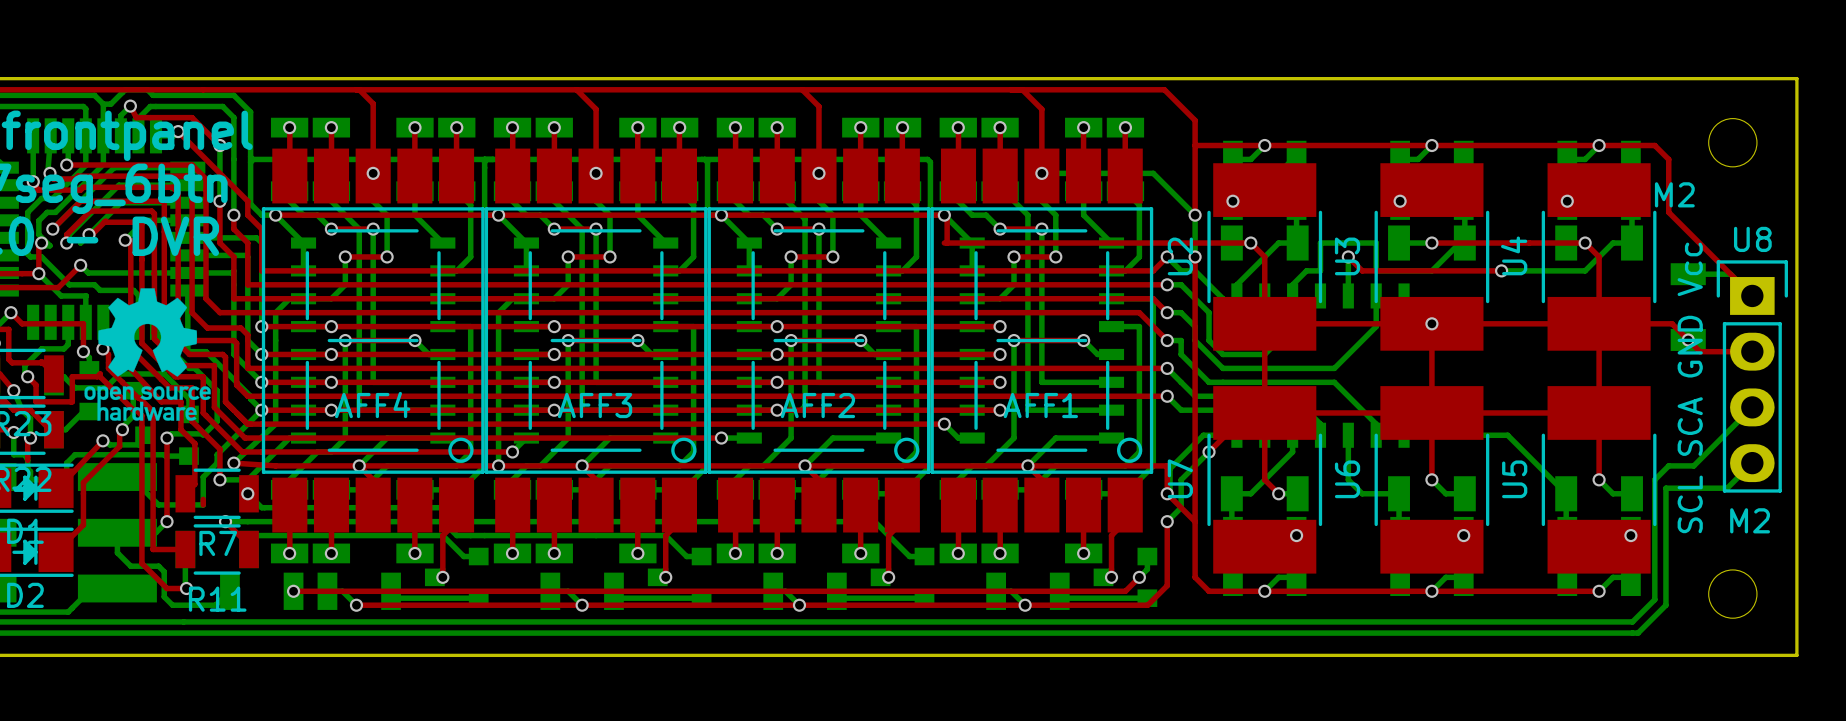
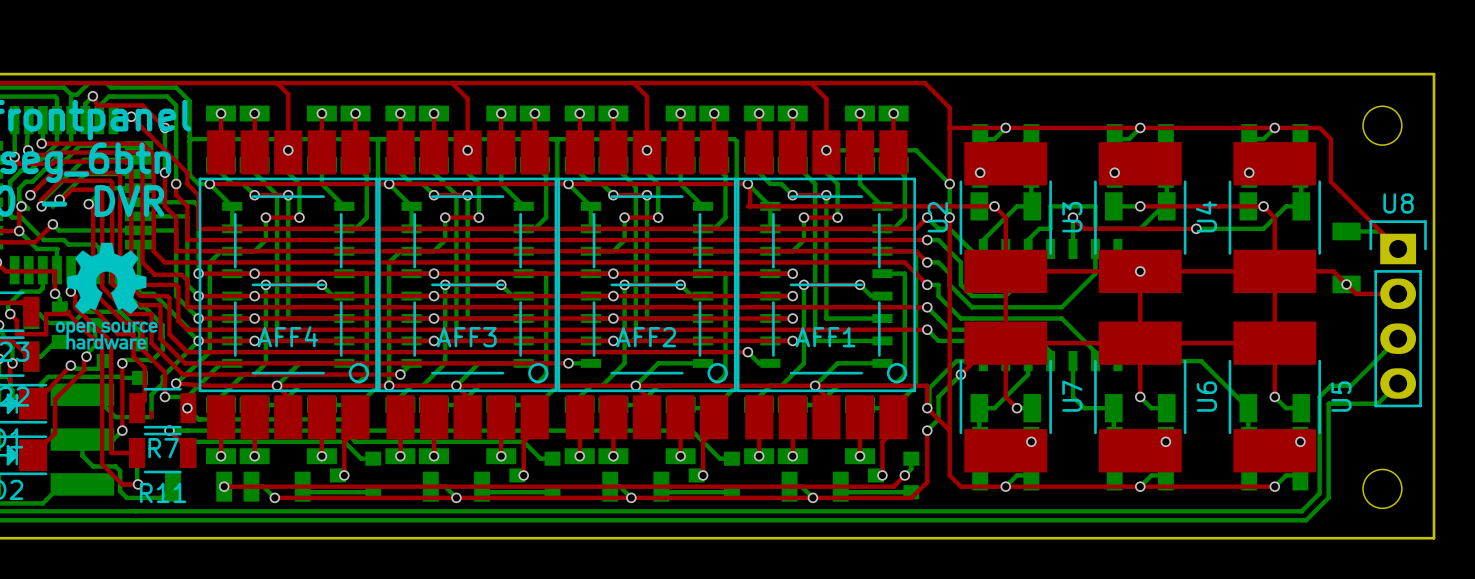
part value: M2 (1674, 194) -> none
U8 value: SCL SCA GND Vcc (1690, 387) -> none
U7 name position: U7 (1180, 478) -> U7 (1072, 396)
U6 name position: U6 (1347, 479) -> U6 (1206, 396)
U5 name position: U5 (1514, 479) -> U5 (1341, 396)
part value: M2 (1750, 520) -> none

